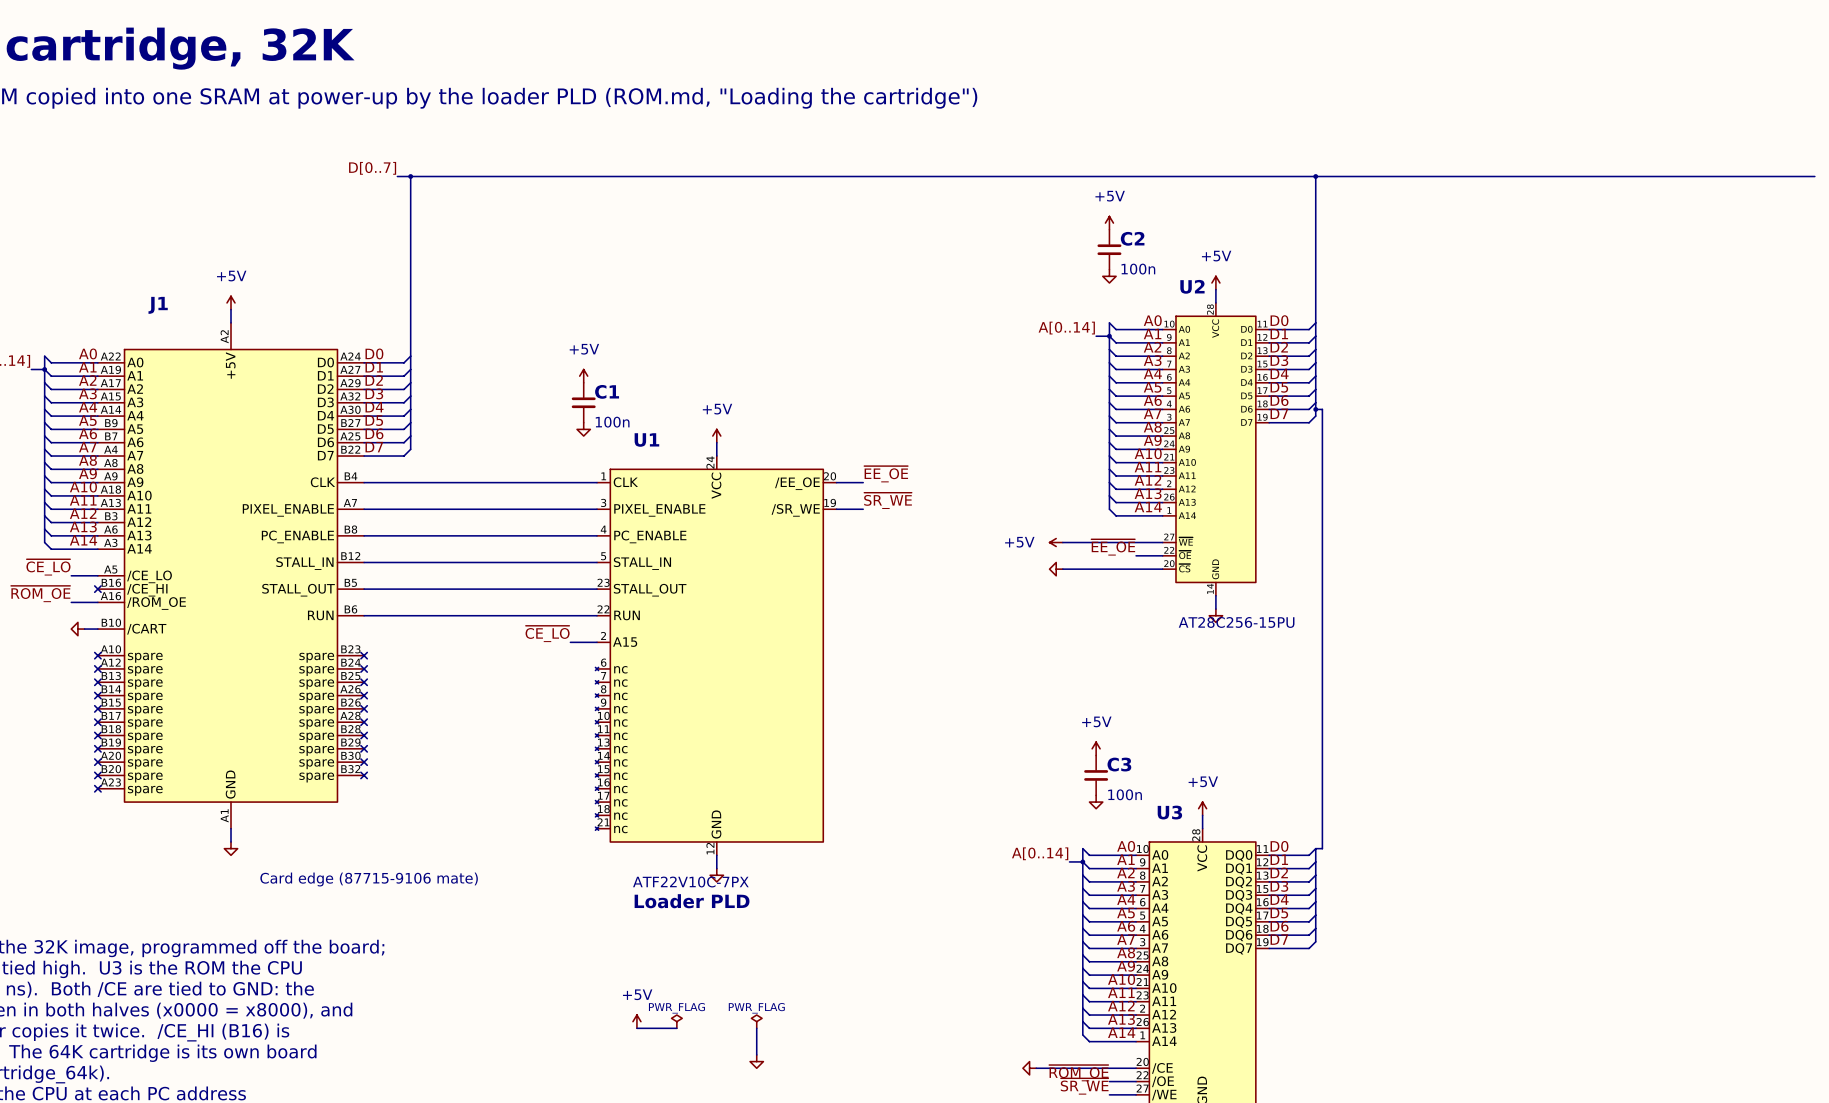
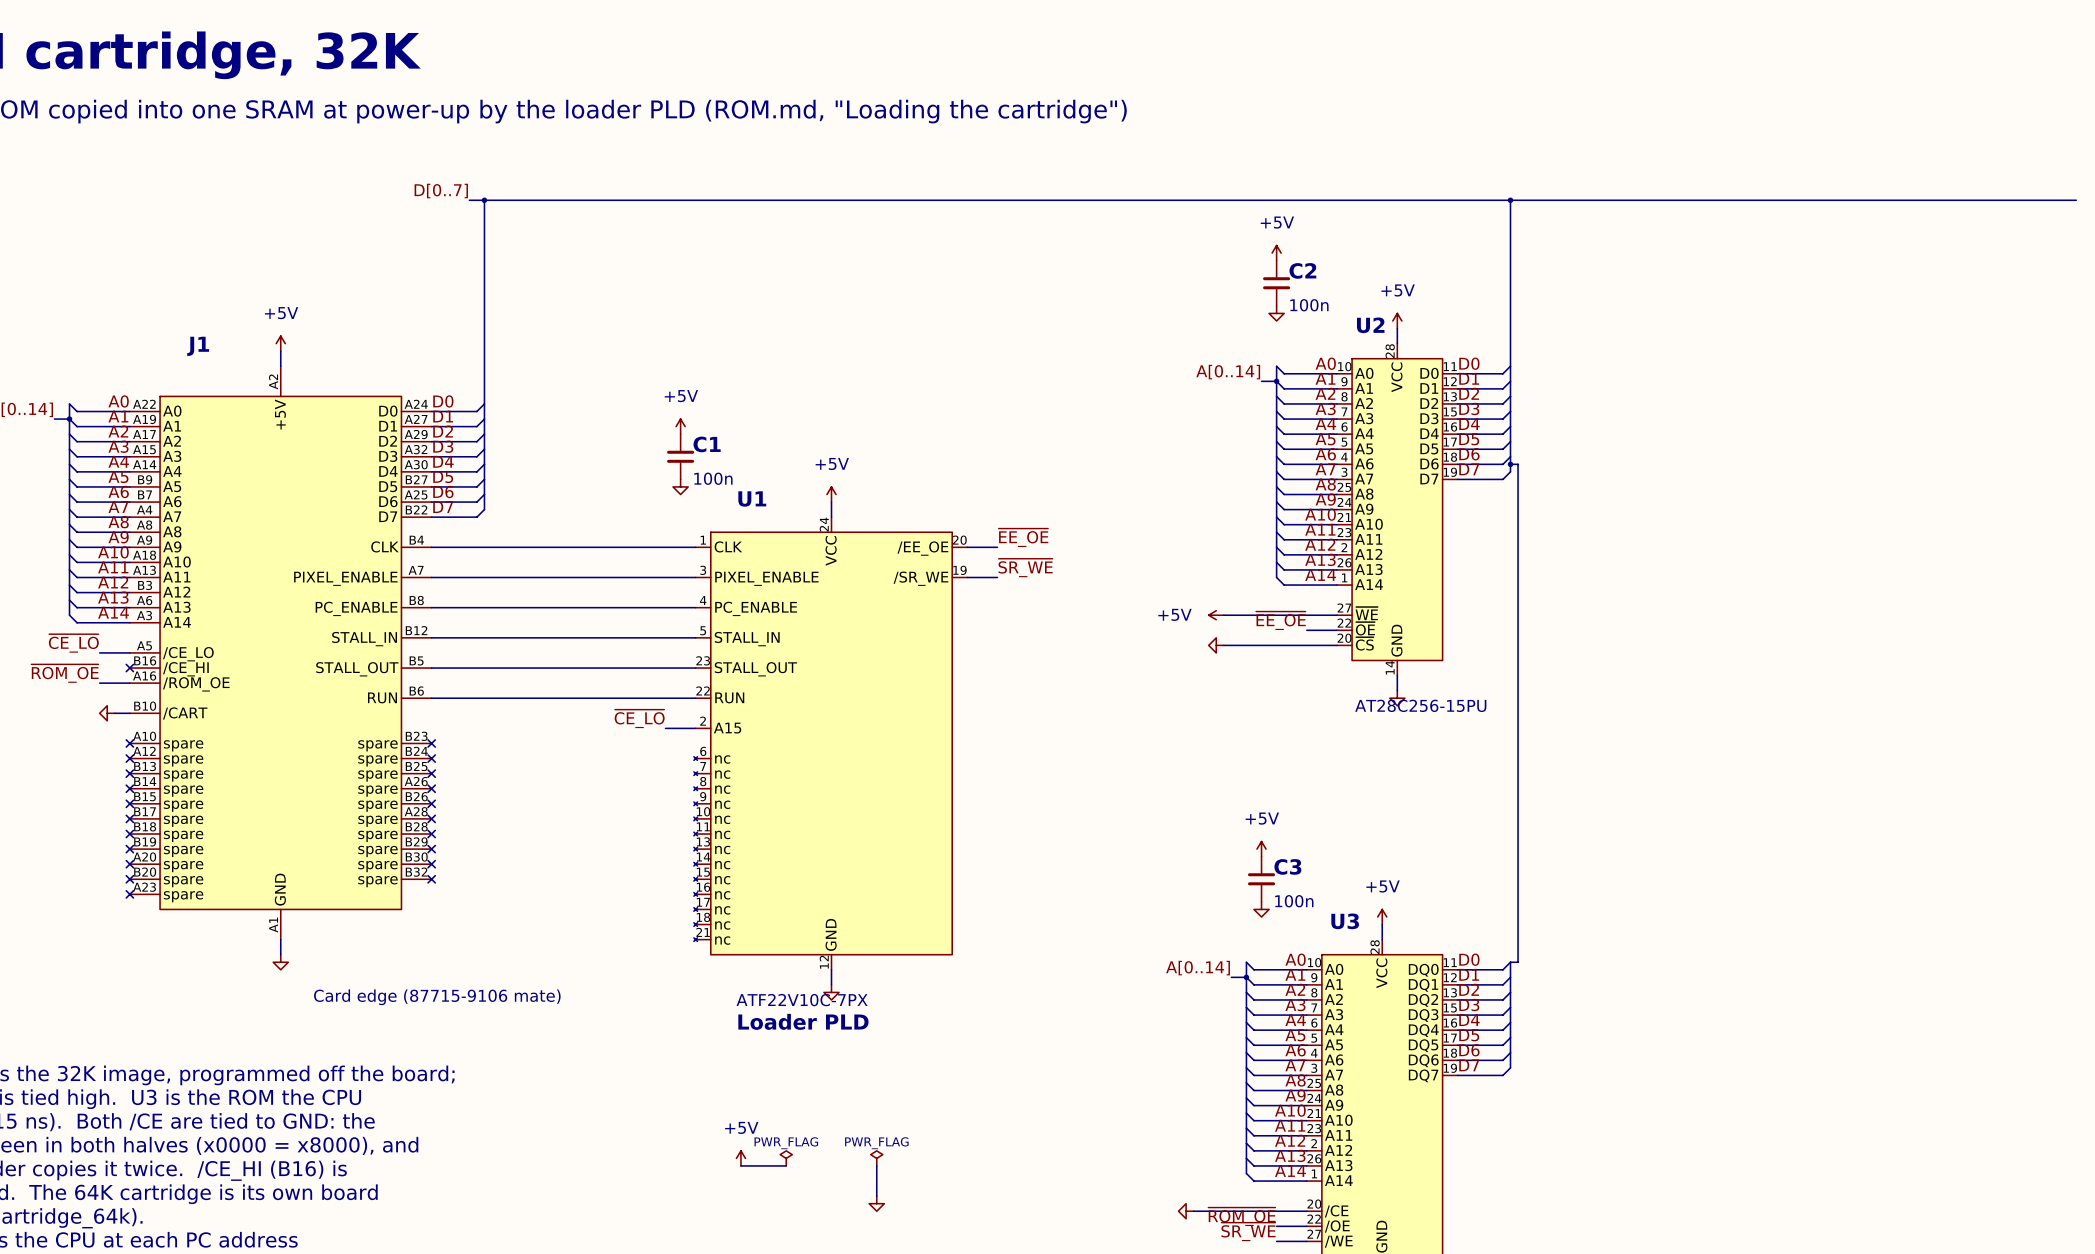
U2 symbol: [1162, 302, 1270, 596] -> [1336, 343, 1458, 676]

